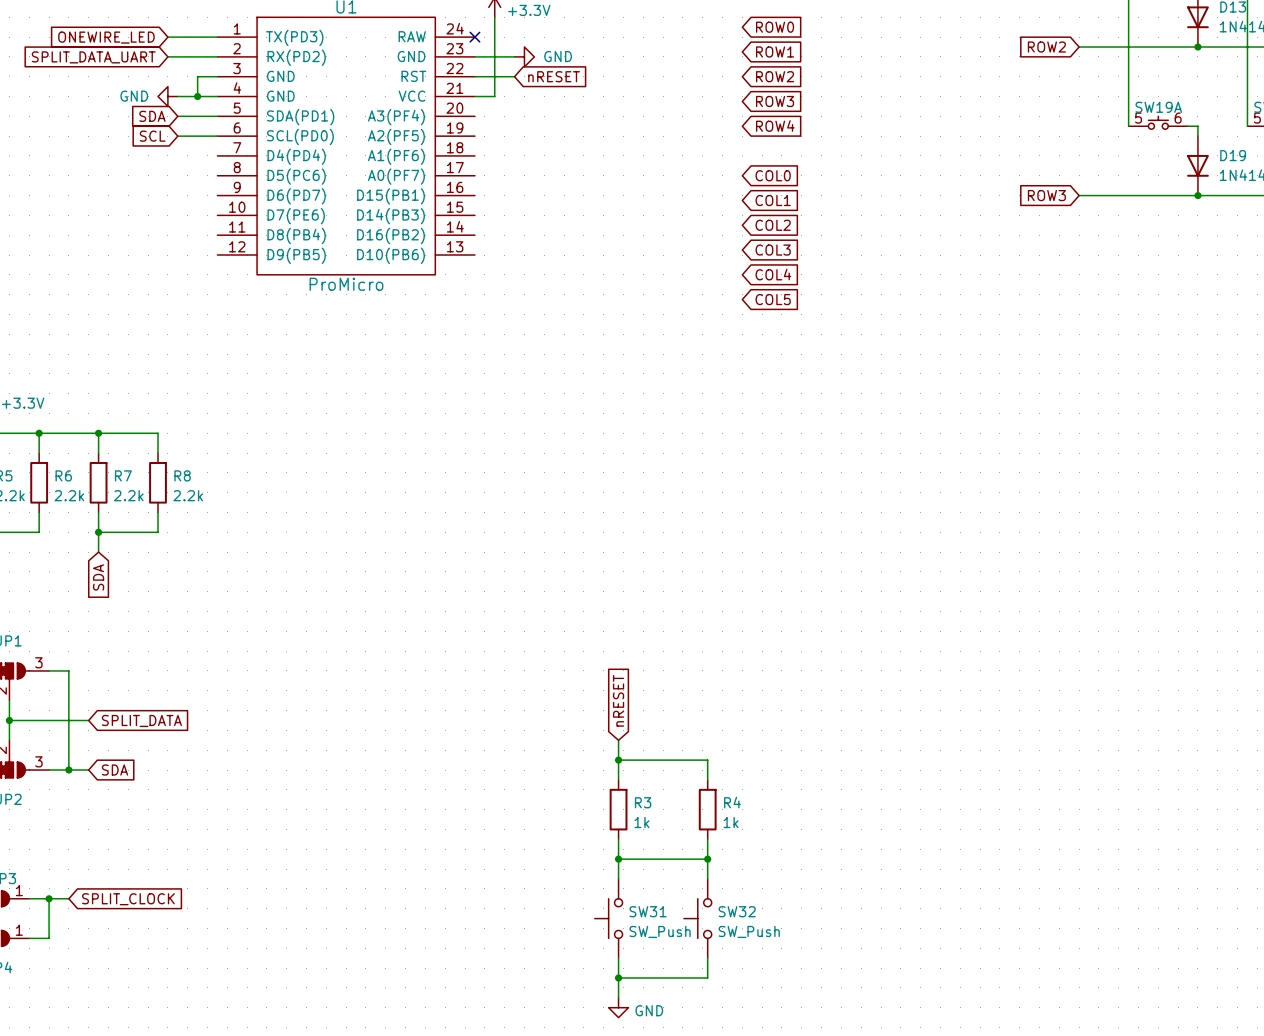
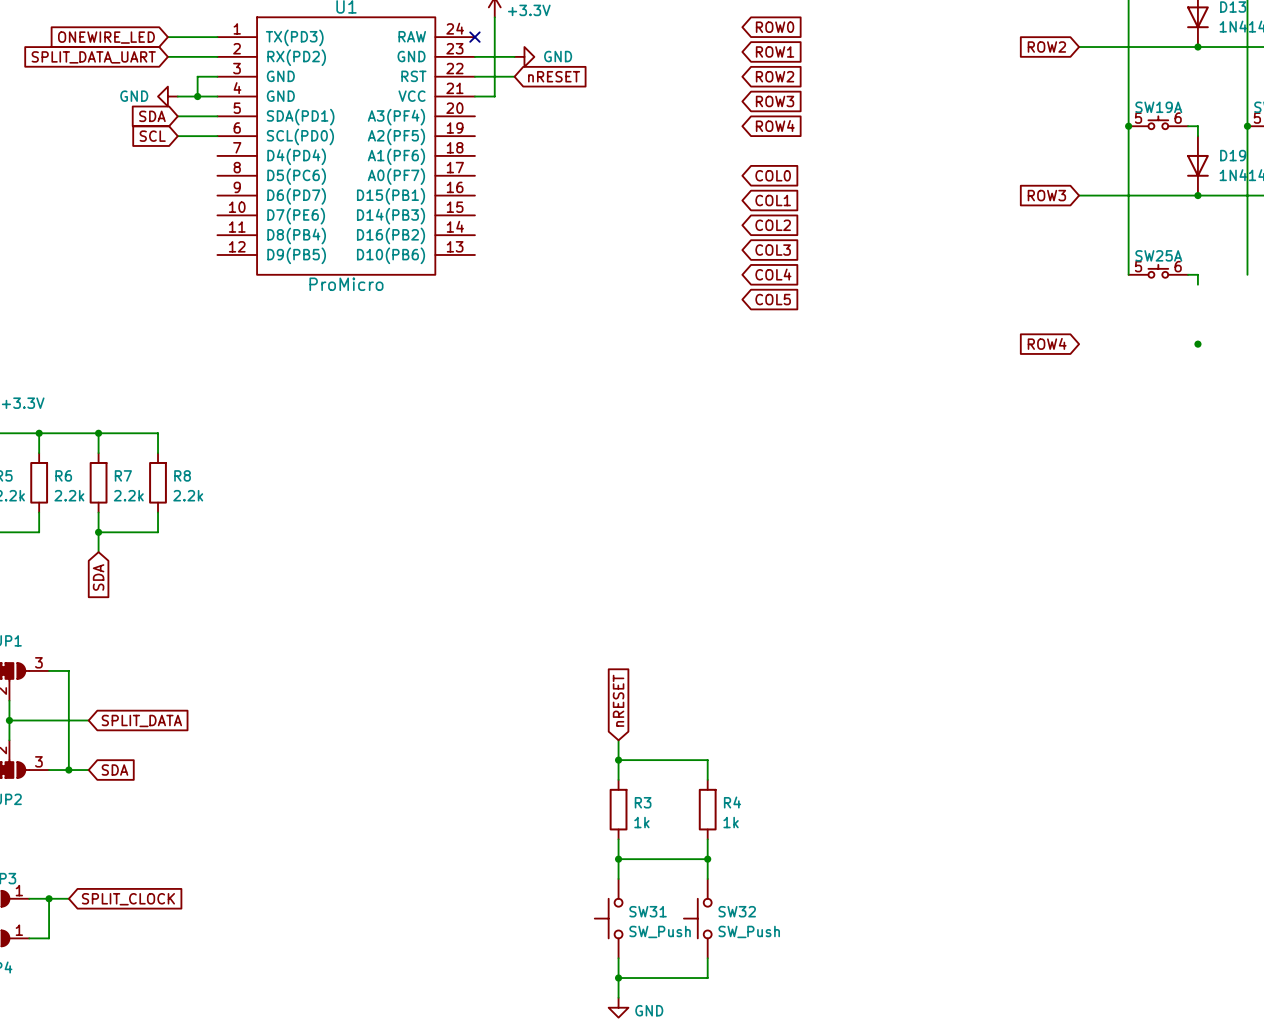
wire: none -> (1128, 126) (1128, 274)
junction: none -> (1128, 126)
wire: none -> (1247, 126) (1247, 274)
junction: none -> (1247, 126)
SW25A: none -> (1158, 271)
wire: none -> (1188, 274) (1197, 274) (1197, 284)
global label: none -> ROW4 (1047, 343)
junction: none -> (1197, 344)

